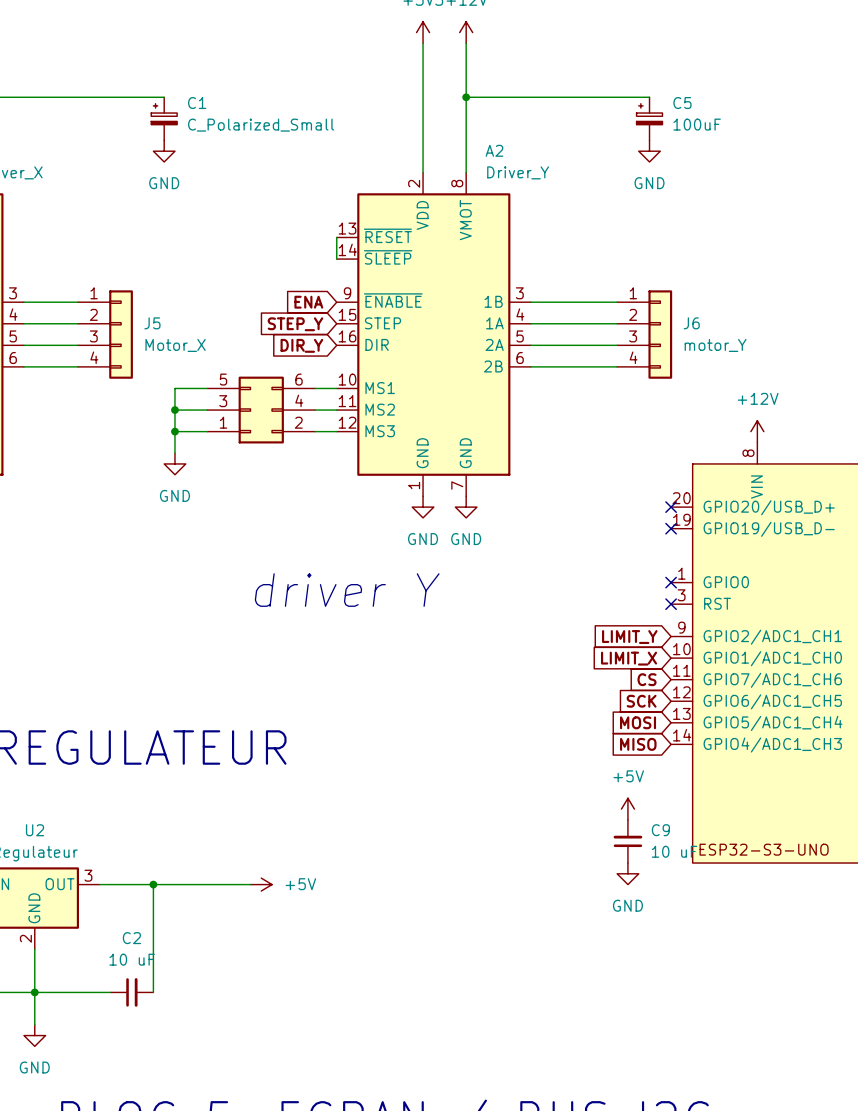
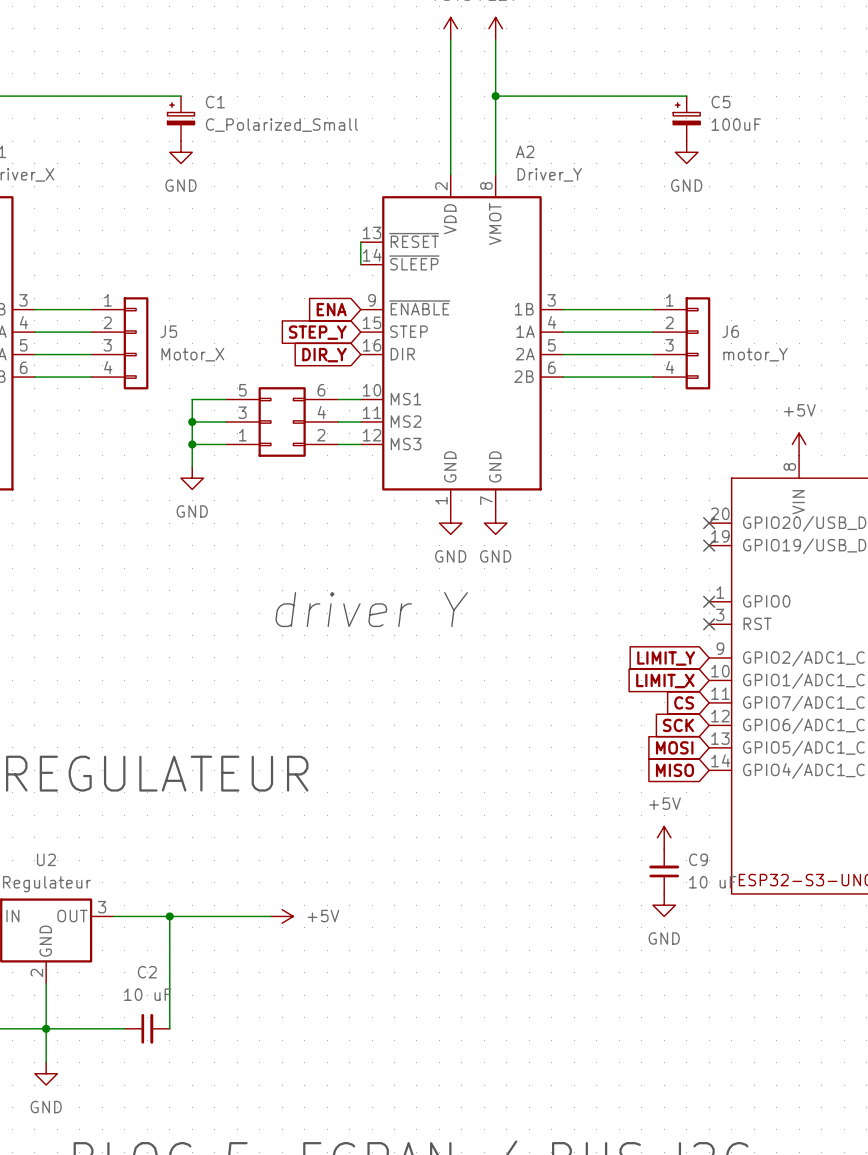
power symbol: +12V (757, 431) -> +5V (799, 444)

